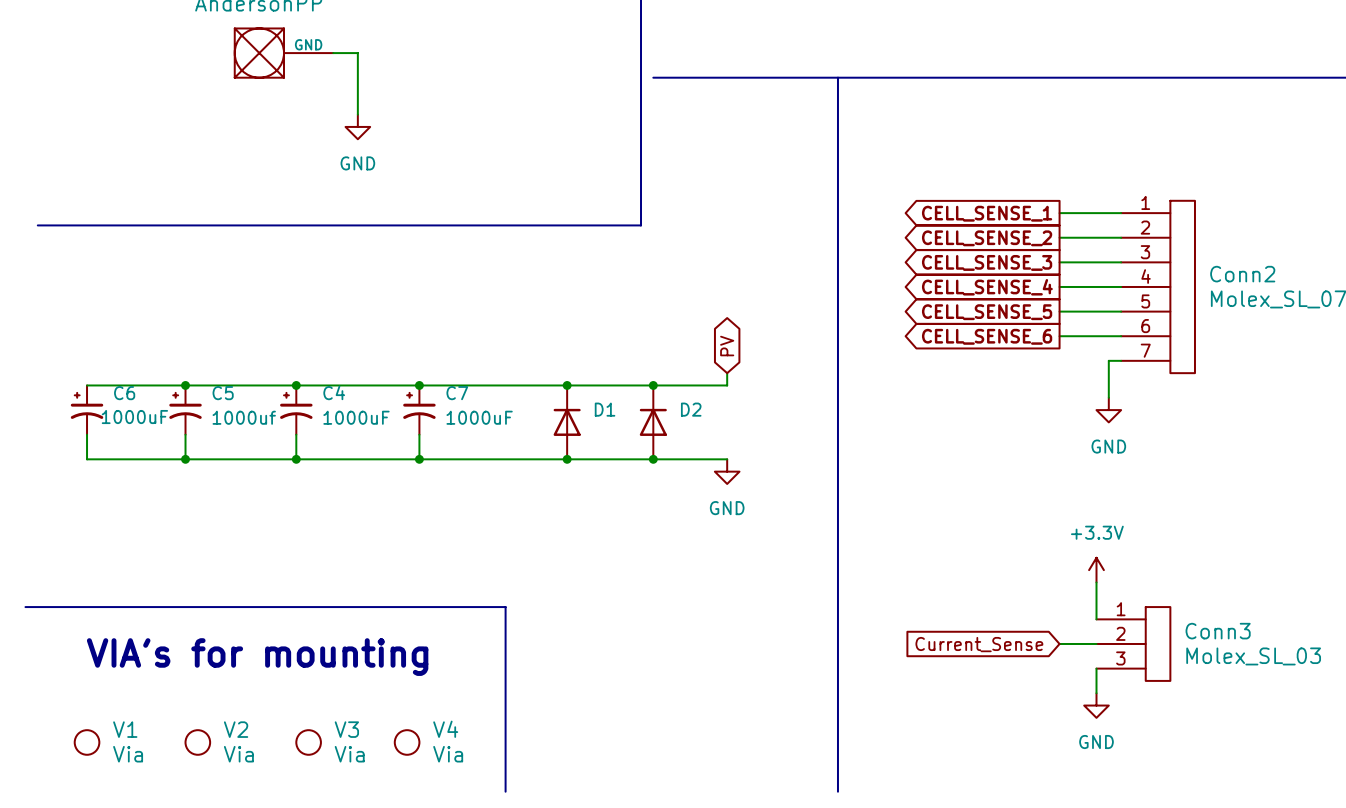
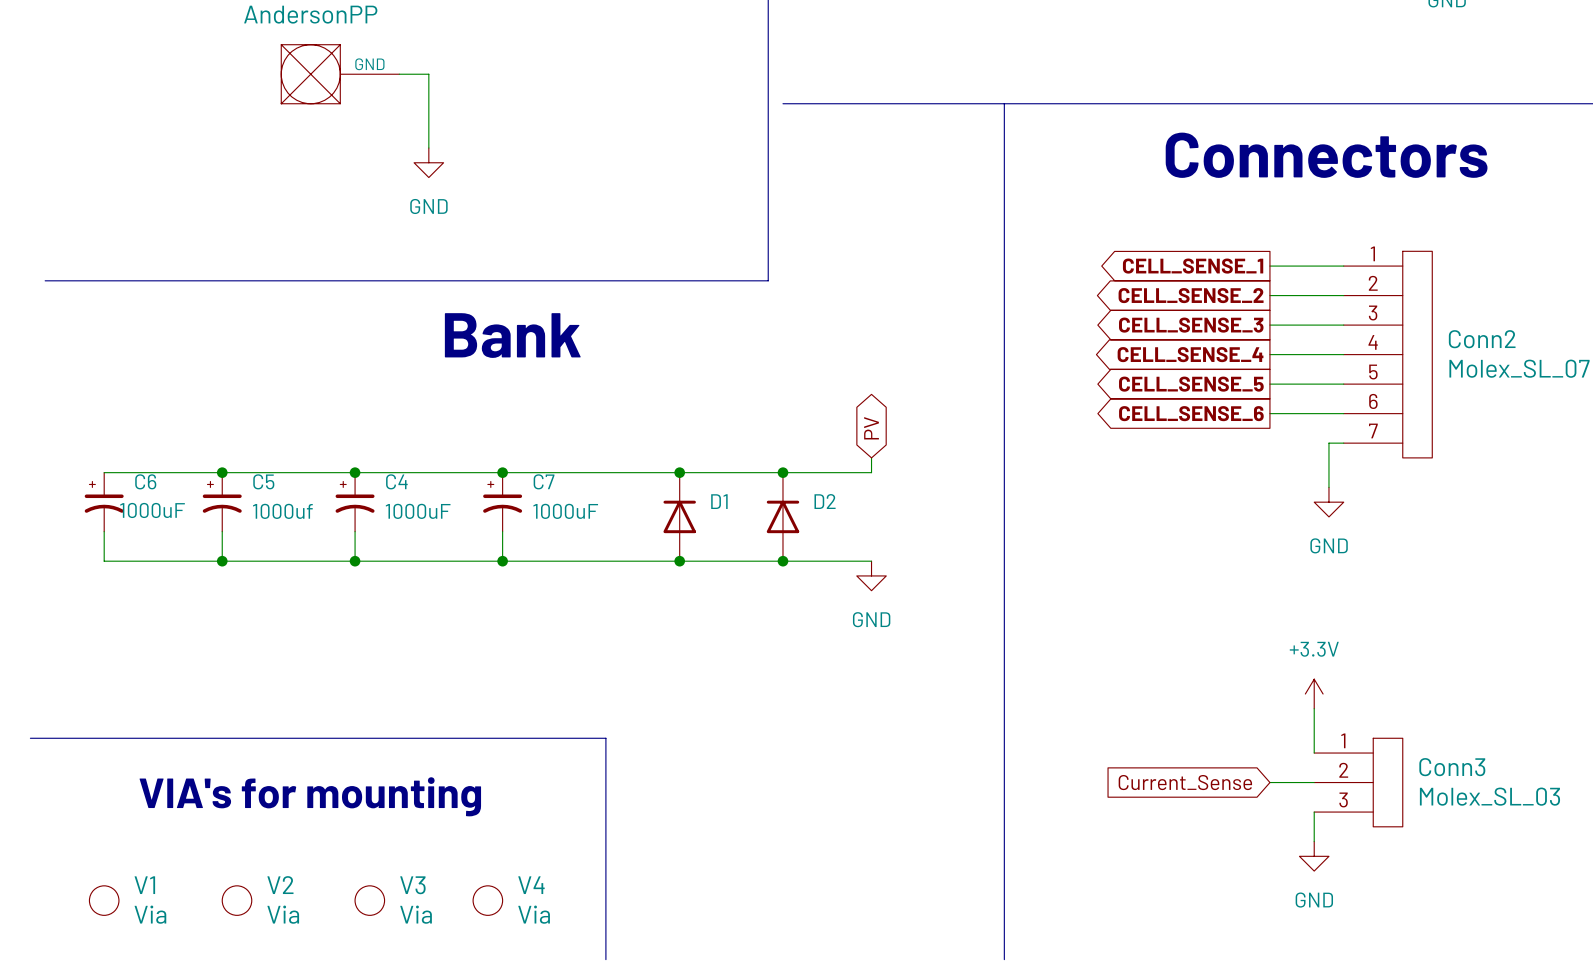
text: none -> Connectors (1326, 155)
text: none -> Bank (512, 335)

